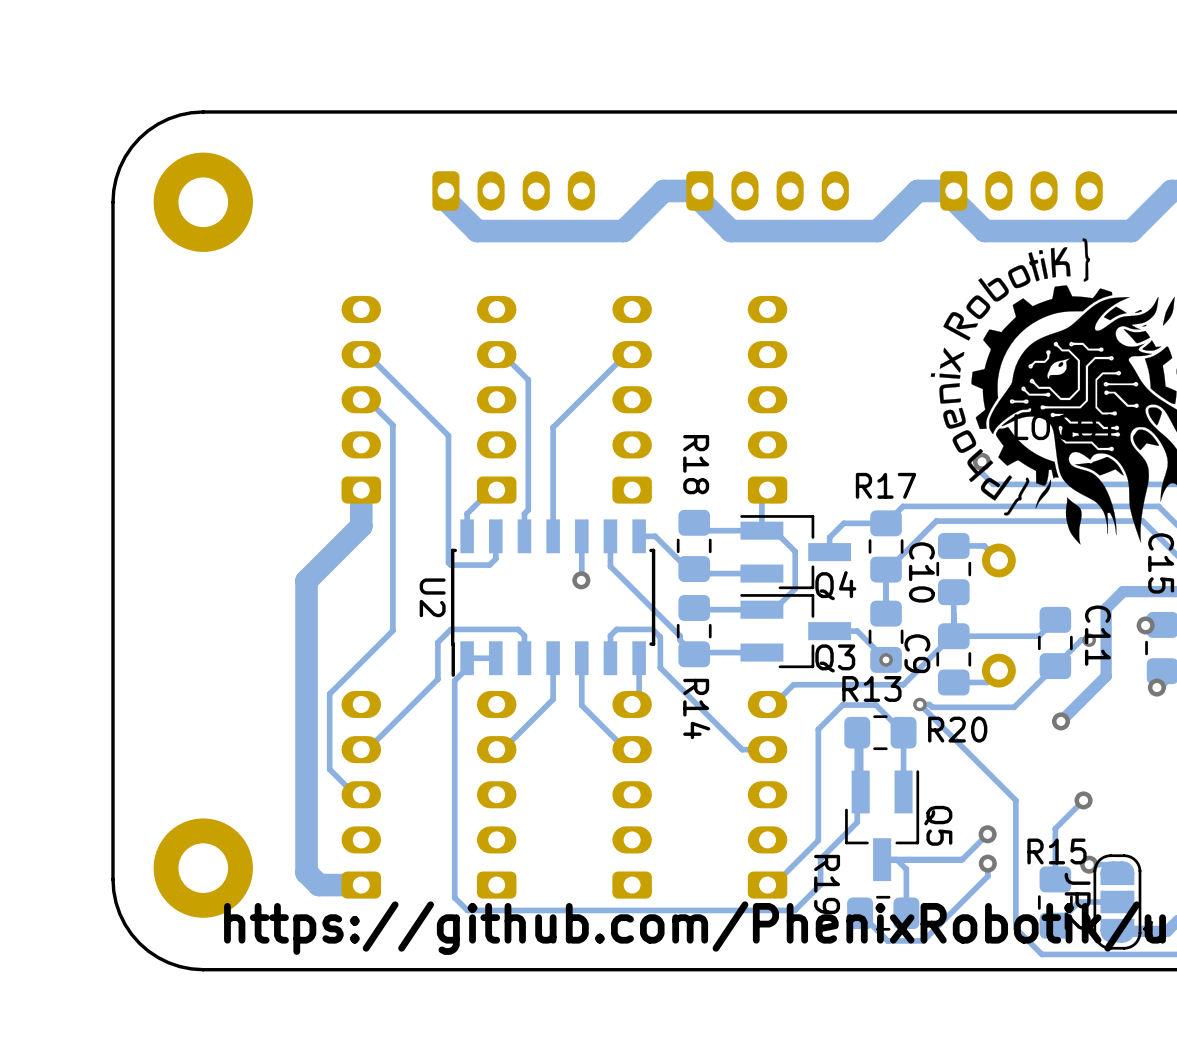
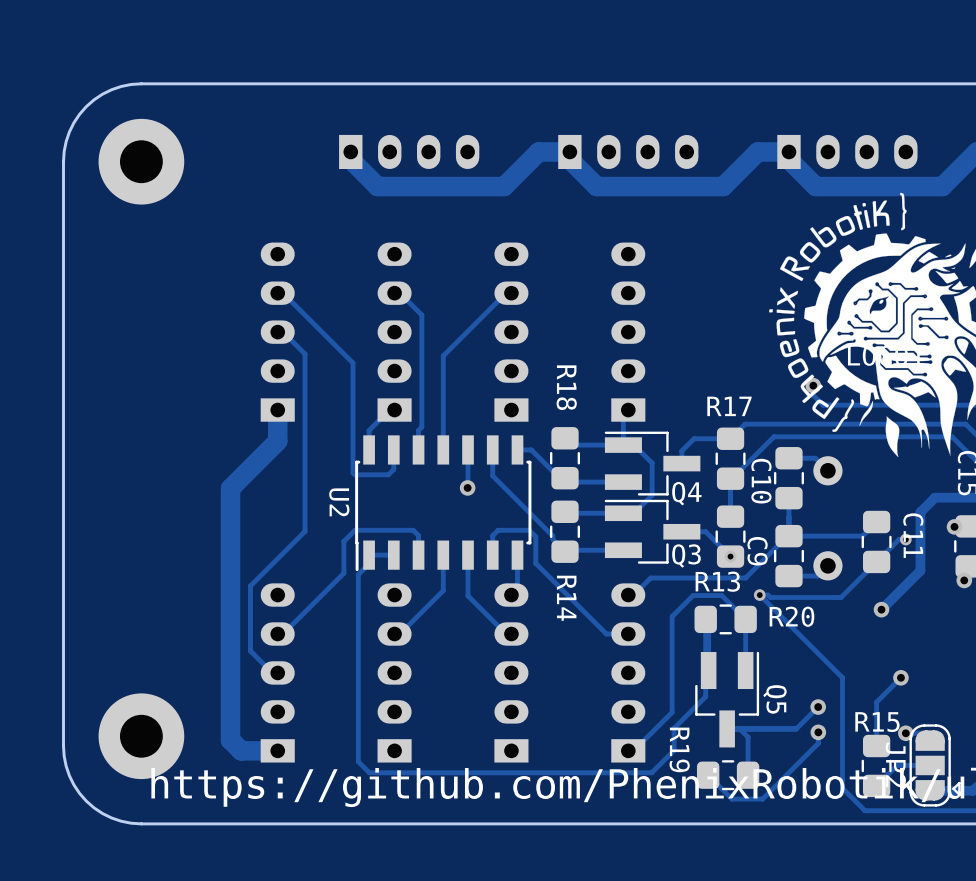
part footprint: [432, 171, 595, 211] -> [339, 134, 480, 170]
part footprint: [686, 171, 849, 211] -> [558, 134, 699, 170]
part footprint: [940, 171, 1103, 211] -> [777, 134, 918, 170]
part footprint: [341, 295, 382, 504] -> [260, 242, 295, 422]
part footprint: [476, 295, 517, 504] -> [377, 242, 412, 422]
part footprint: [612, 295, 652, 504] -> [494, 242, 529, 422]
part footprint: [747, 295, 788, 504] -> [611, 242, 646, 422]
part footprint: [341, 690, 382, 899] -> [260, 583, 295, 763]
part footprint: [476, 690, 517, 899] -> [377, 583, 412, 763]
part footprint: [612, 690, 652, 899] -> [494, 583, 529, 763]
part footprint: [747, 690, 788, 899] -> [611, 583, 646, 763]

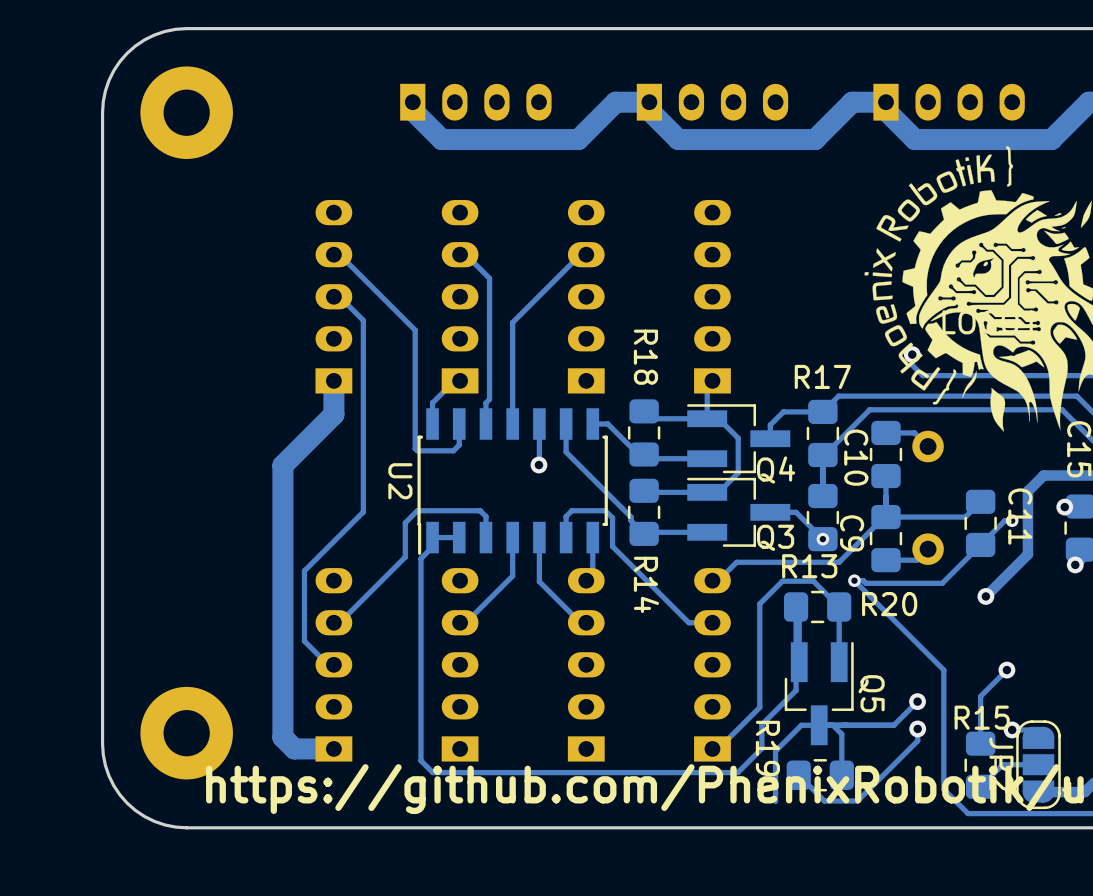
track: none -> (819, 725) (801, 725) (775, 751) (775, 801)

